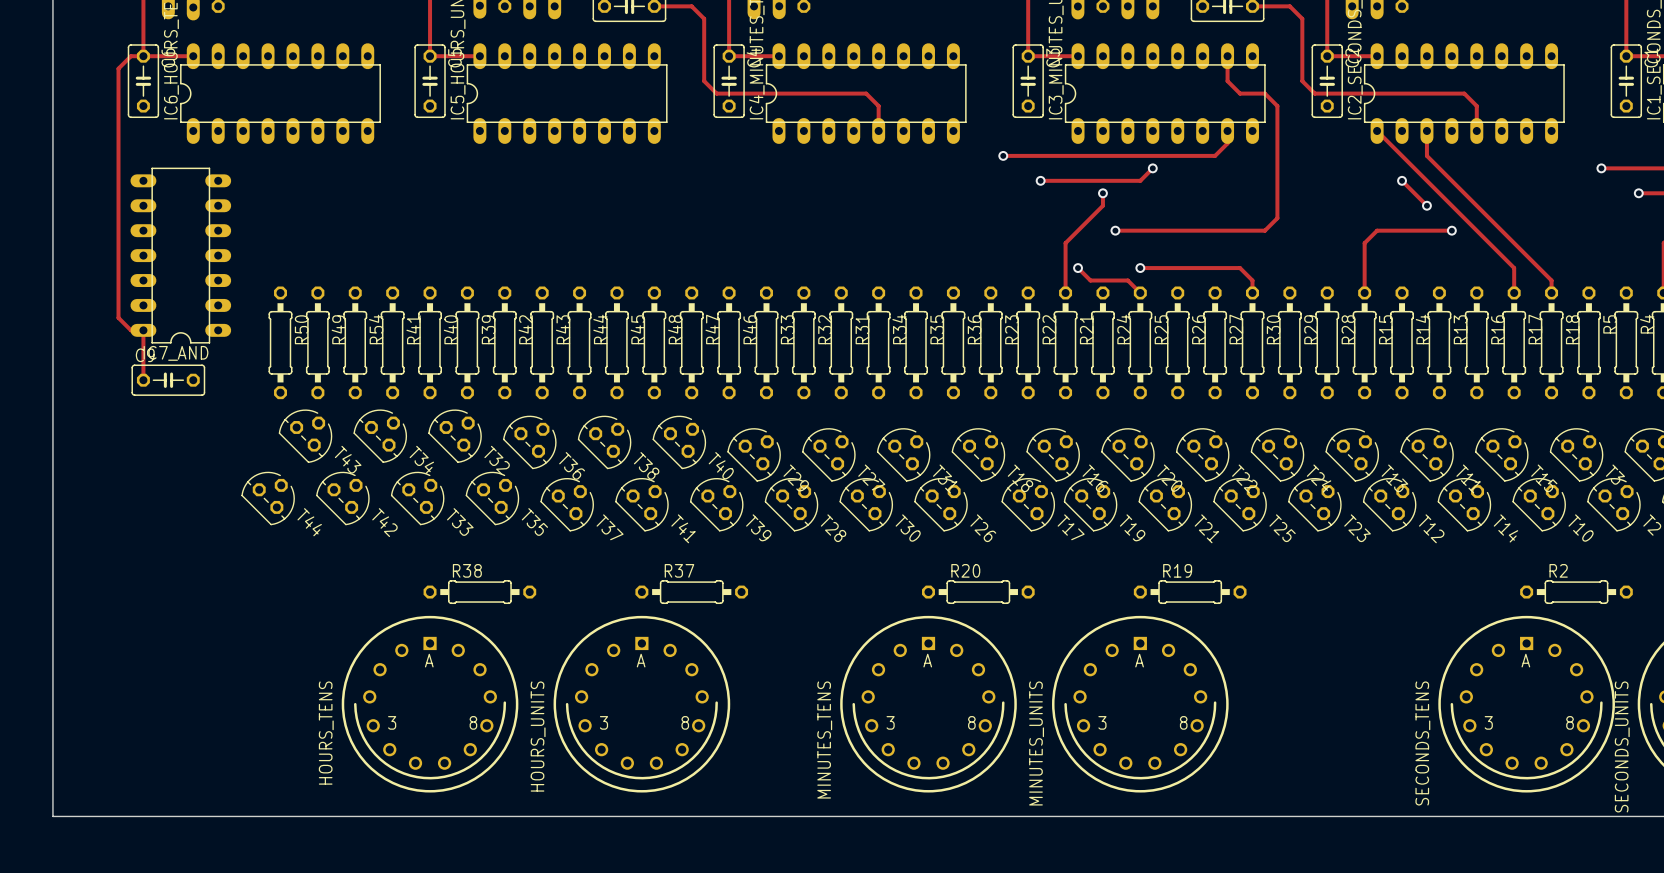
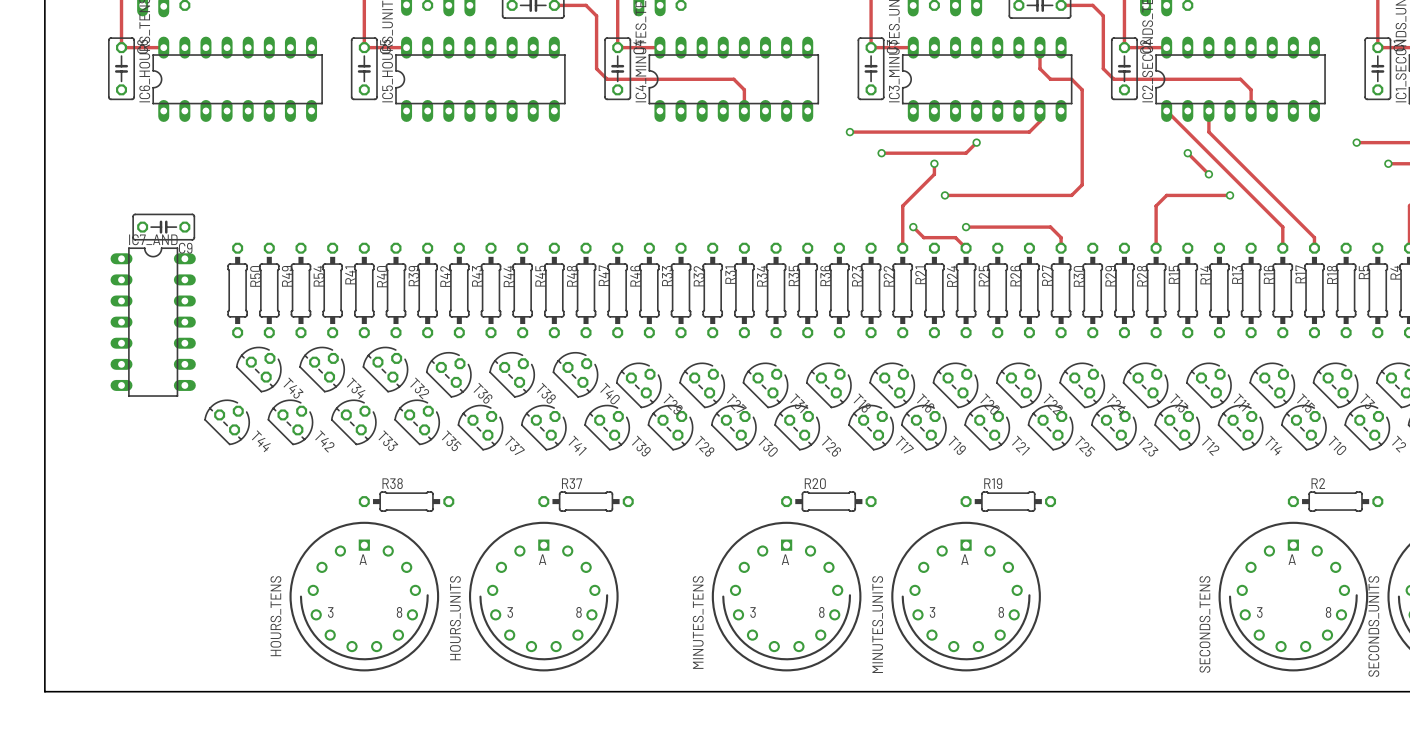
track: (143, 56) (130, 56) (118, 68) (118, 317) (130, 330) (143, 330) (143, 380) -> none
IC7_AND rotation: 0° (180, 255) -> 180° (153, 322)
IC7_AND position: (180, 255) -> (153, 322)
C9 rotation: 0° (168, 380) -> 180° (163, 227)
C9 position: (168, 380) -> (163, 227)

